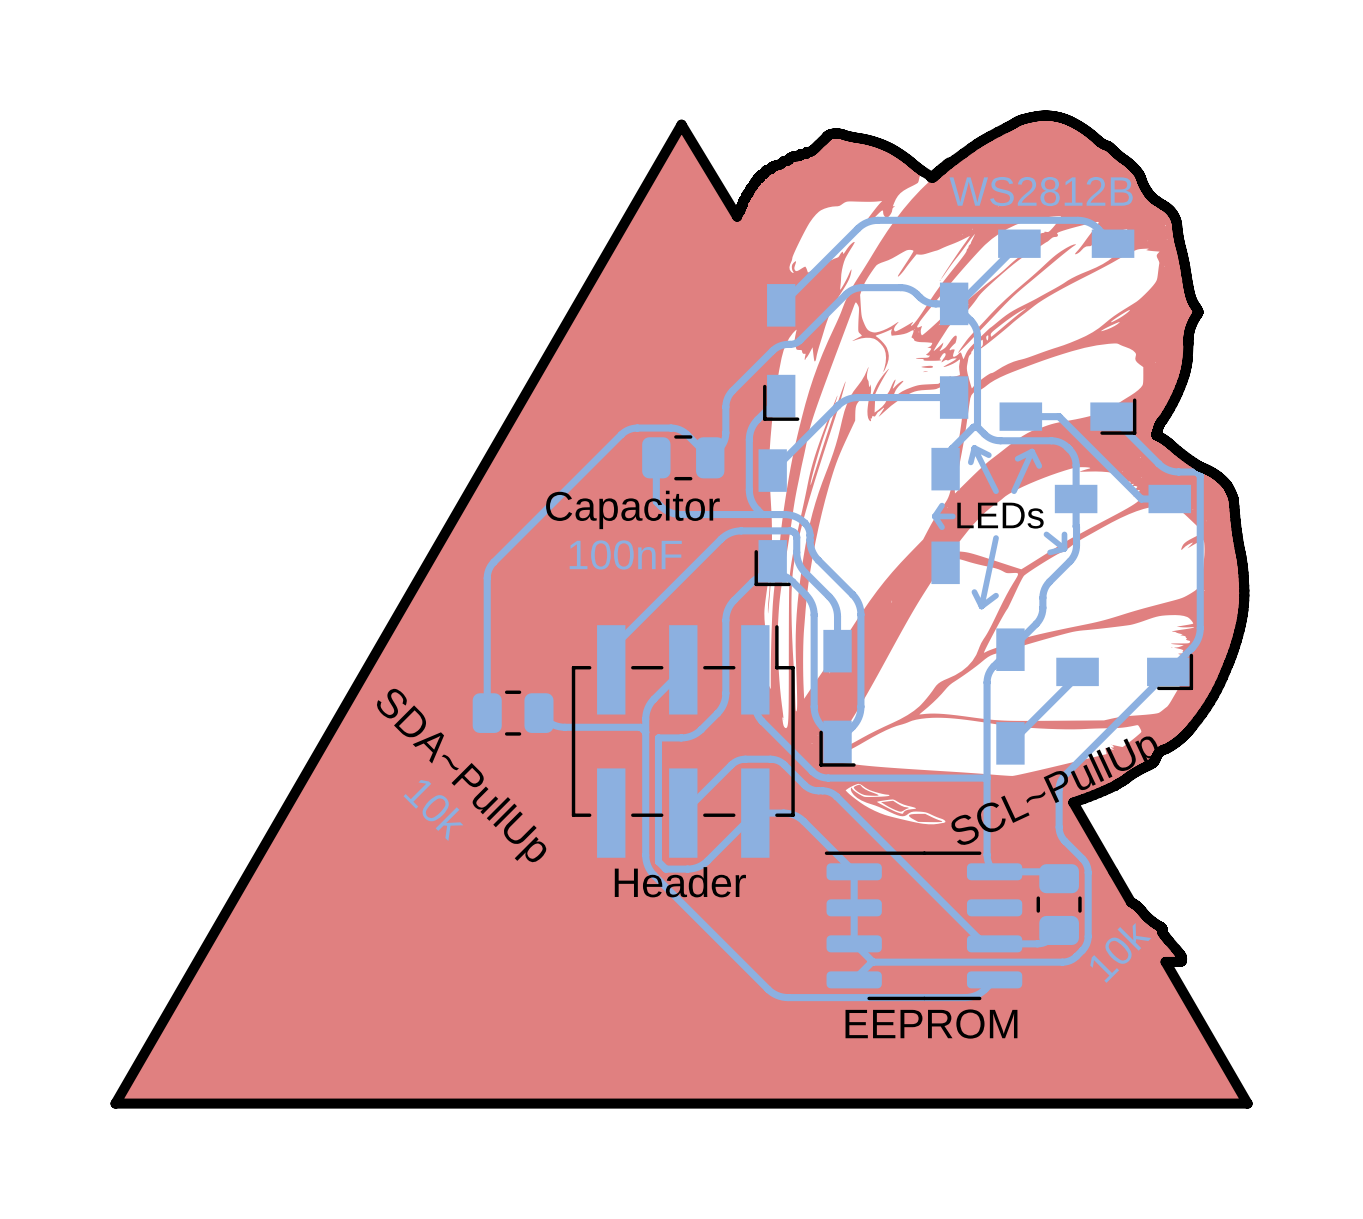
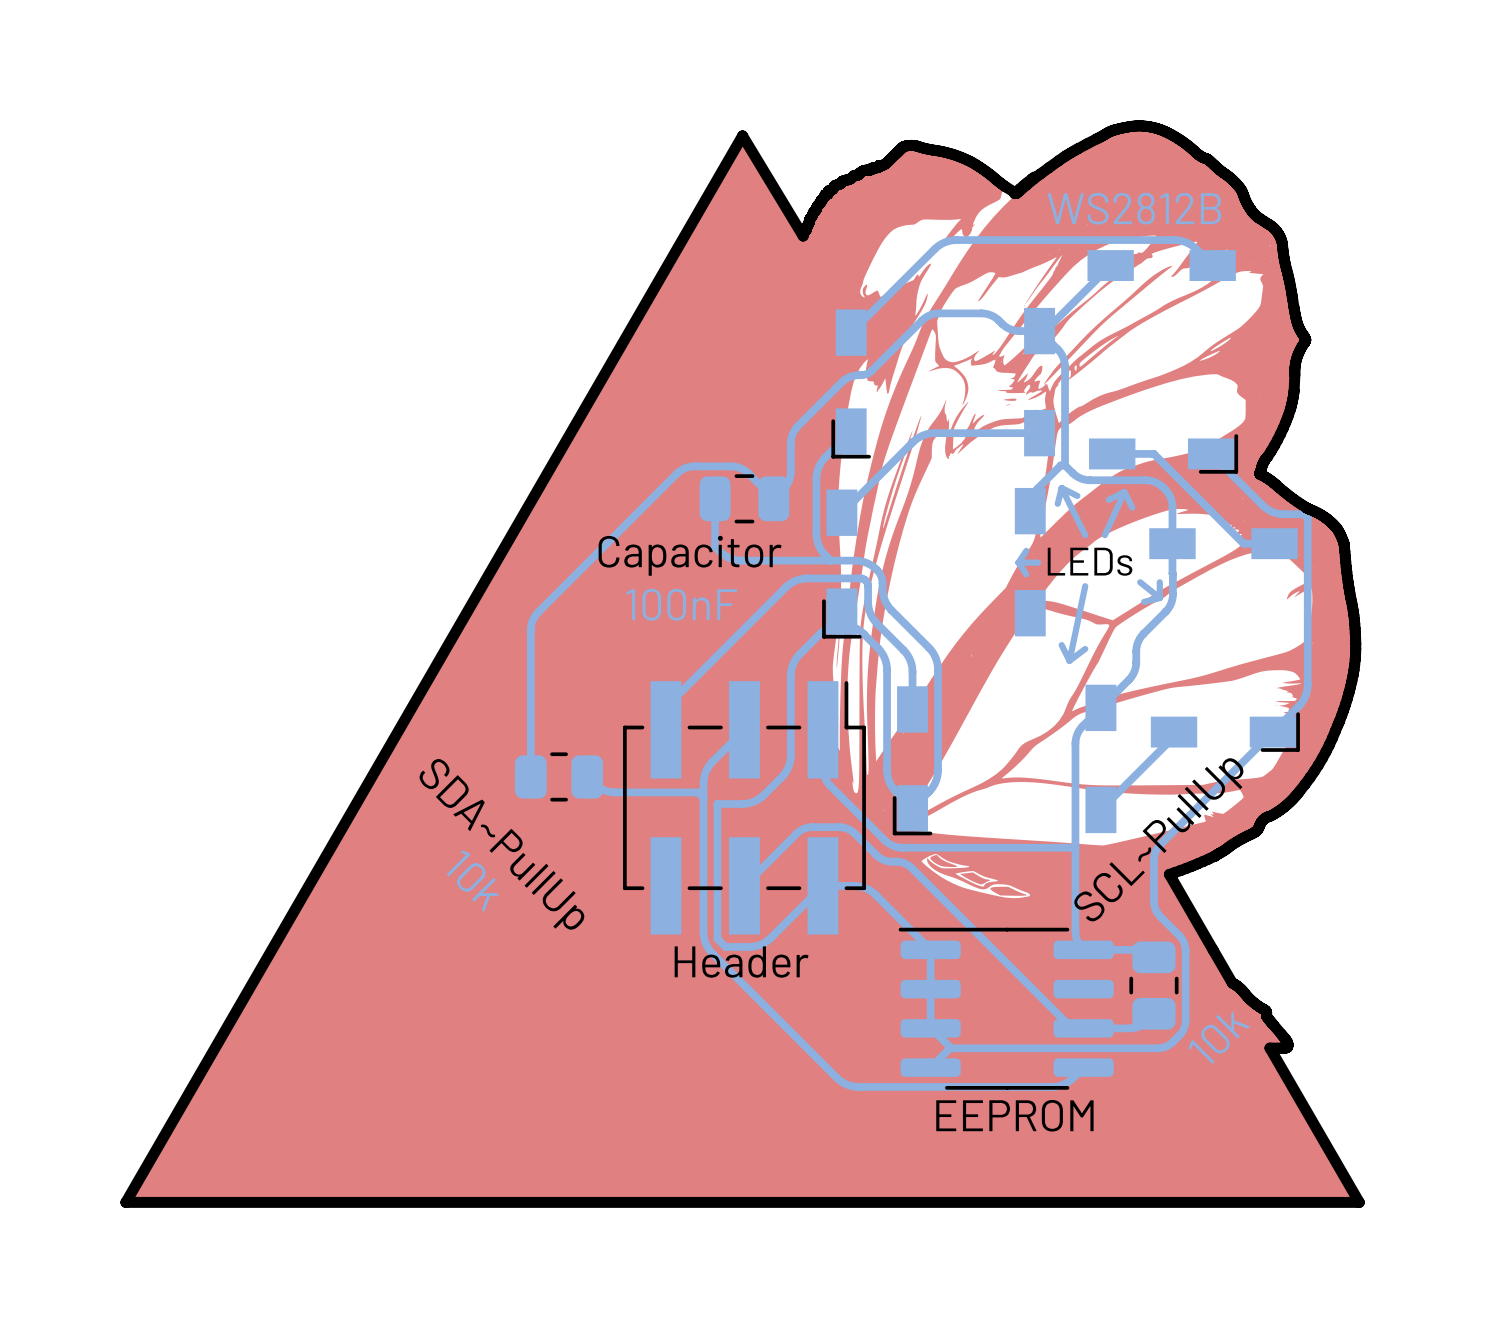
SCL~PullUp name rotation: 0° (1055, 791) -> 20° counterclockwise (1158, 839)

